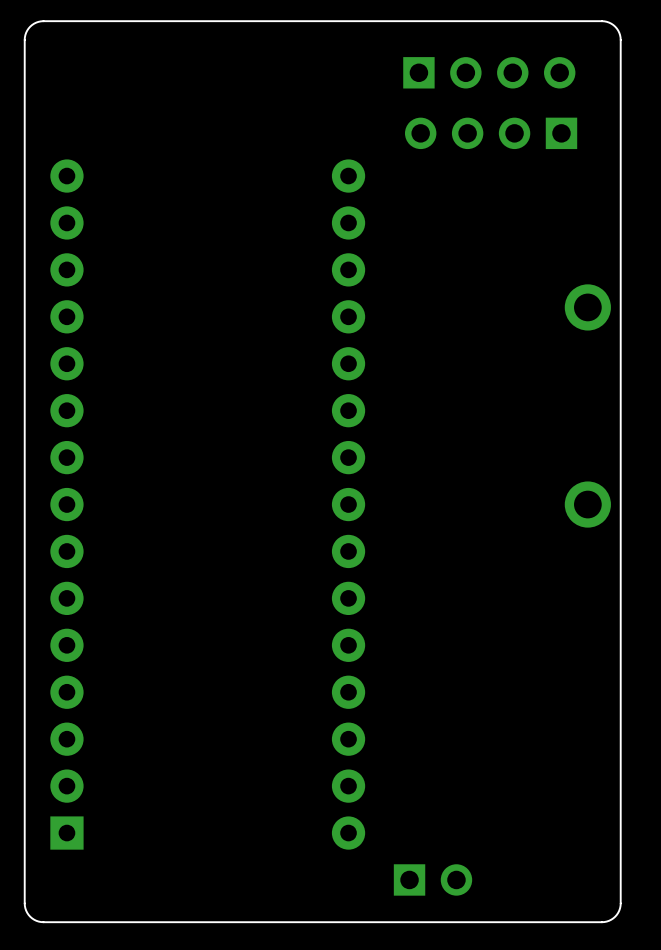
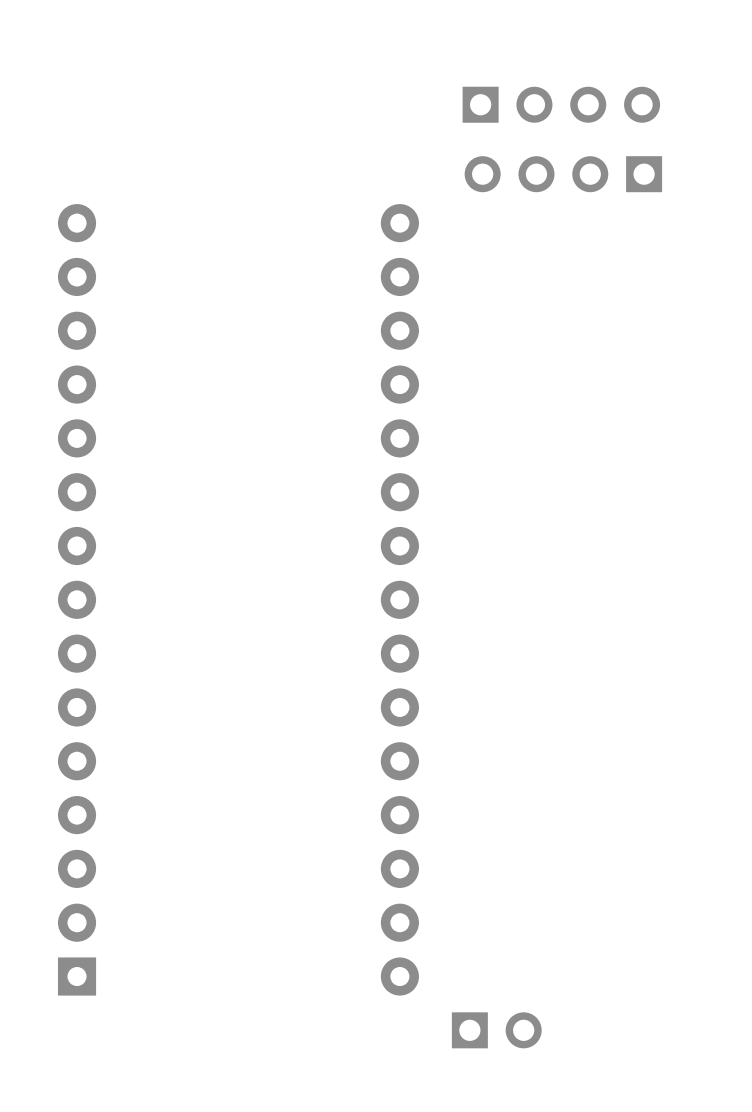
board edge: (601, 21) (43, 21) (34, 23) (27, 30) (24, 39) (24, 903) (27, 912) (34, 919) (43, 922) (601, 922) (611, 919) (618, 912) (620, 903) (620, 39) (615, 26) (601, 21) -> none
part: (587, 307) -> none
part: (587, 504) -> none

